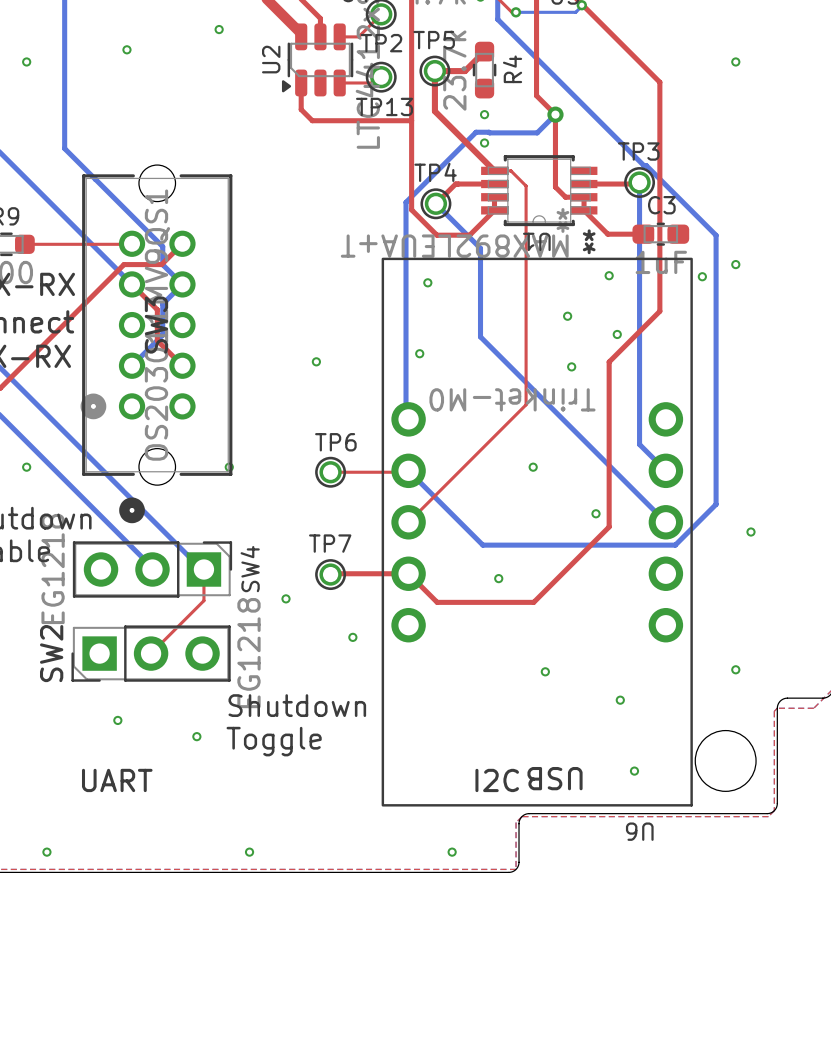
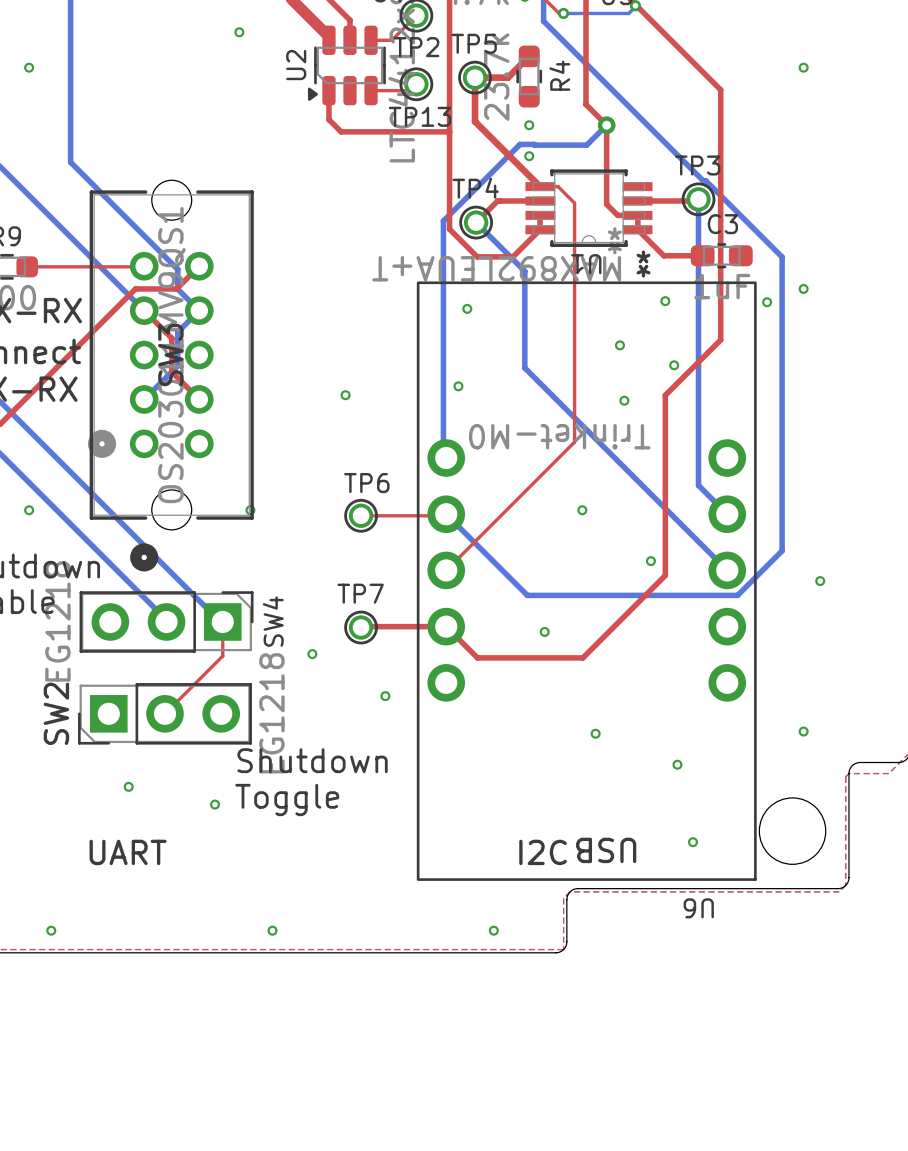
via: (126, 49) -> none
text position: Shutdown (297, 705) -> Shutdown (312, 760)
text position: Toggle (274, 741) -> Toggle (287, 800)

